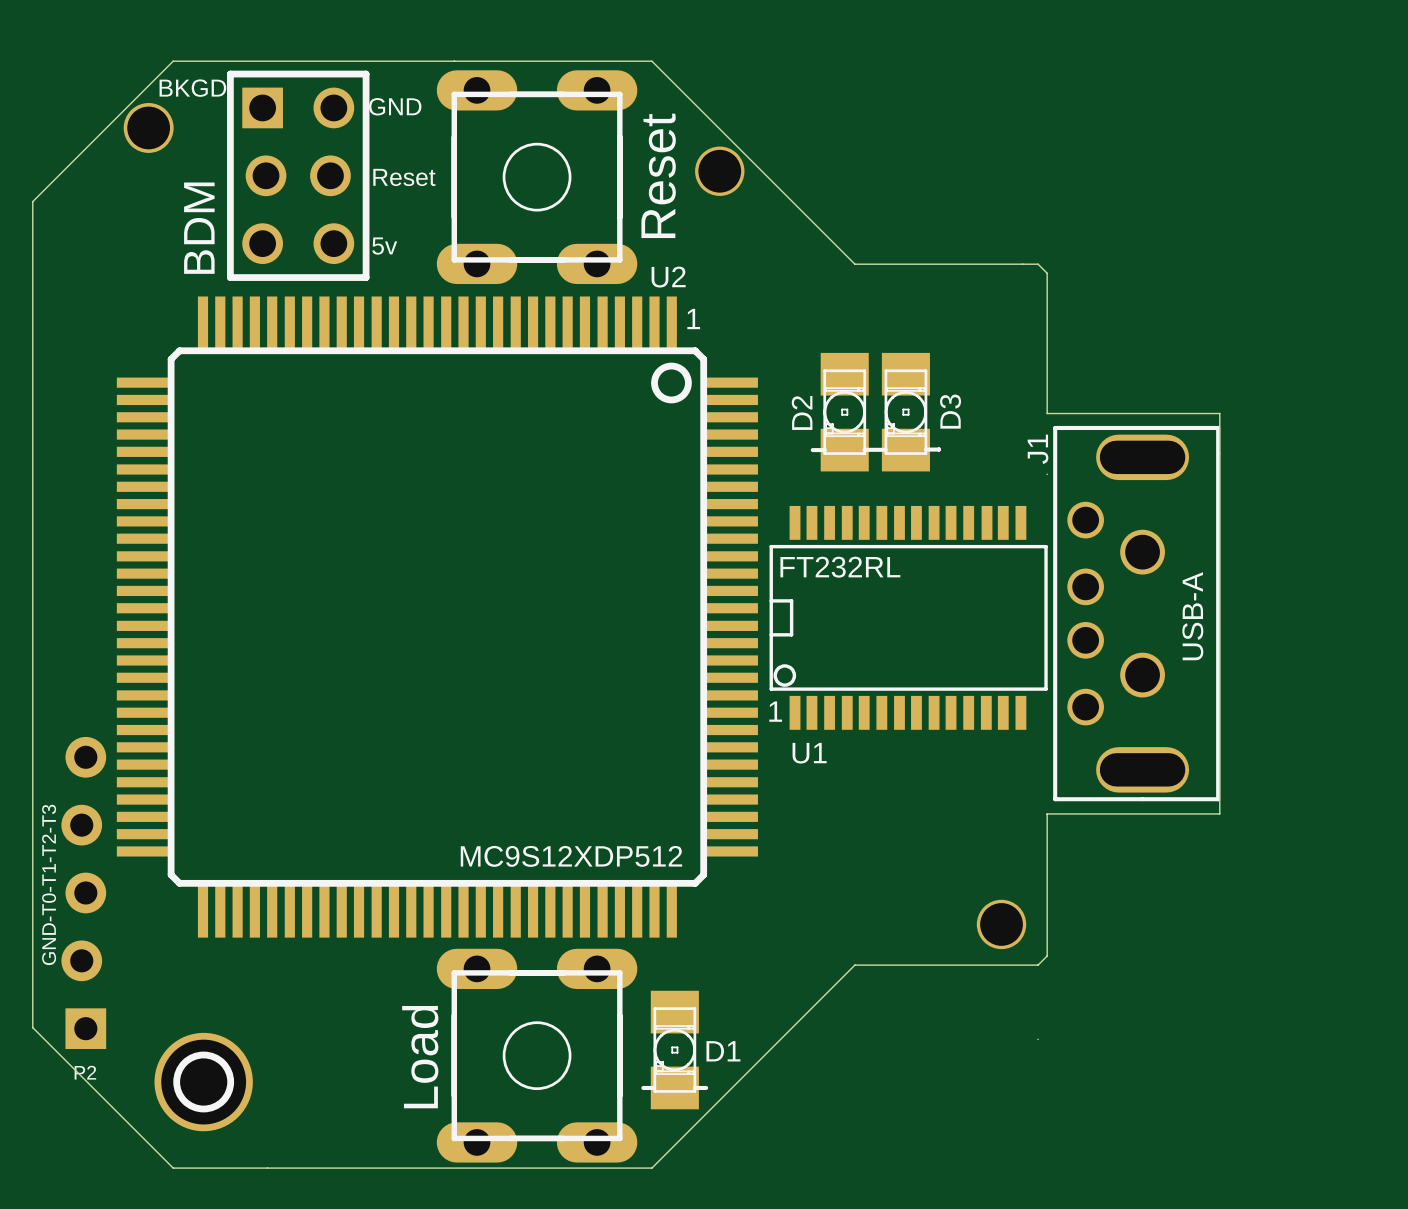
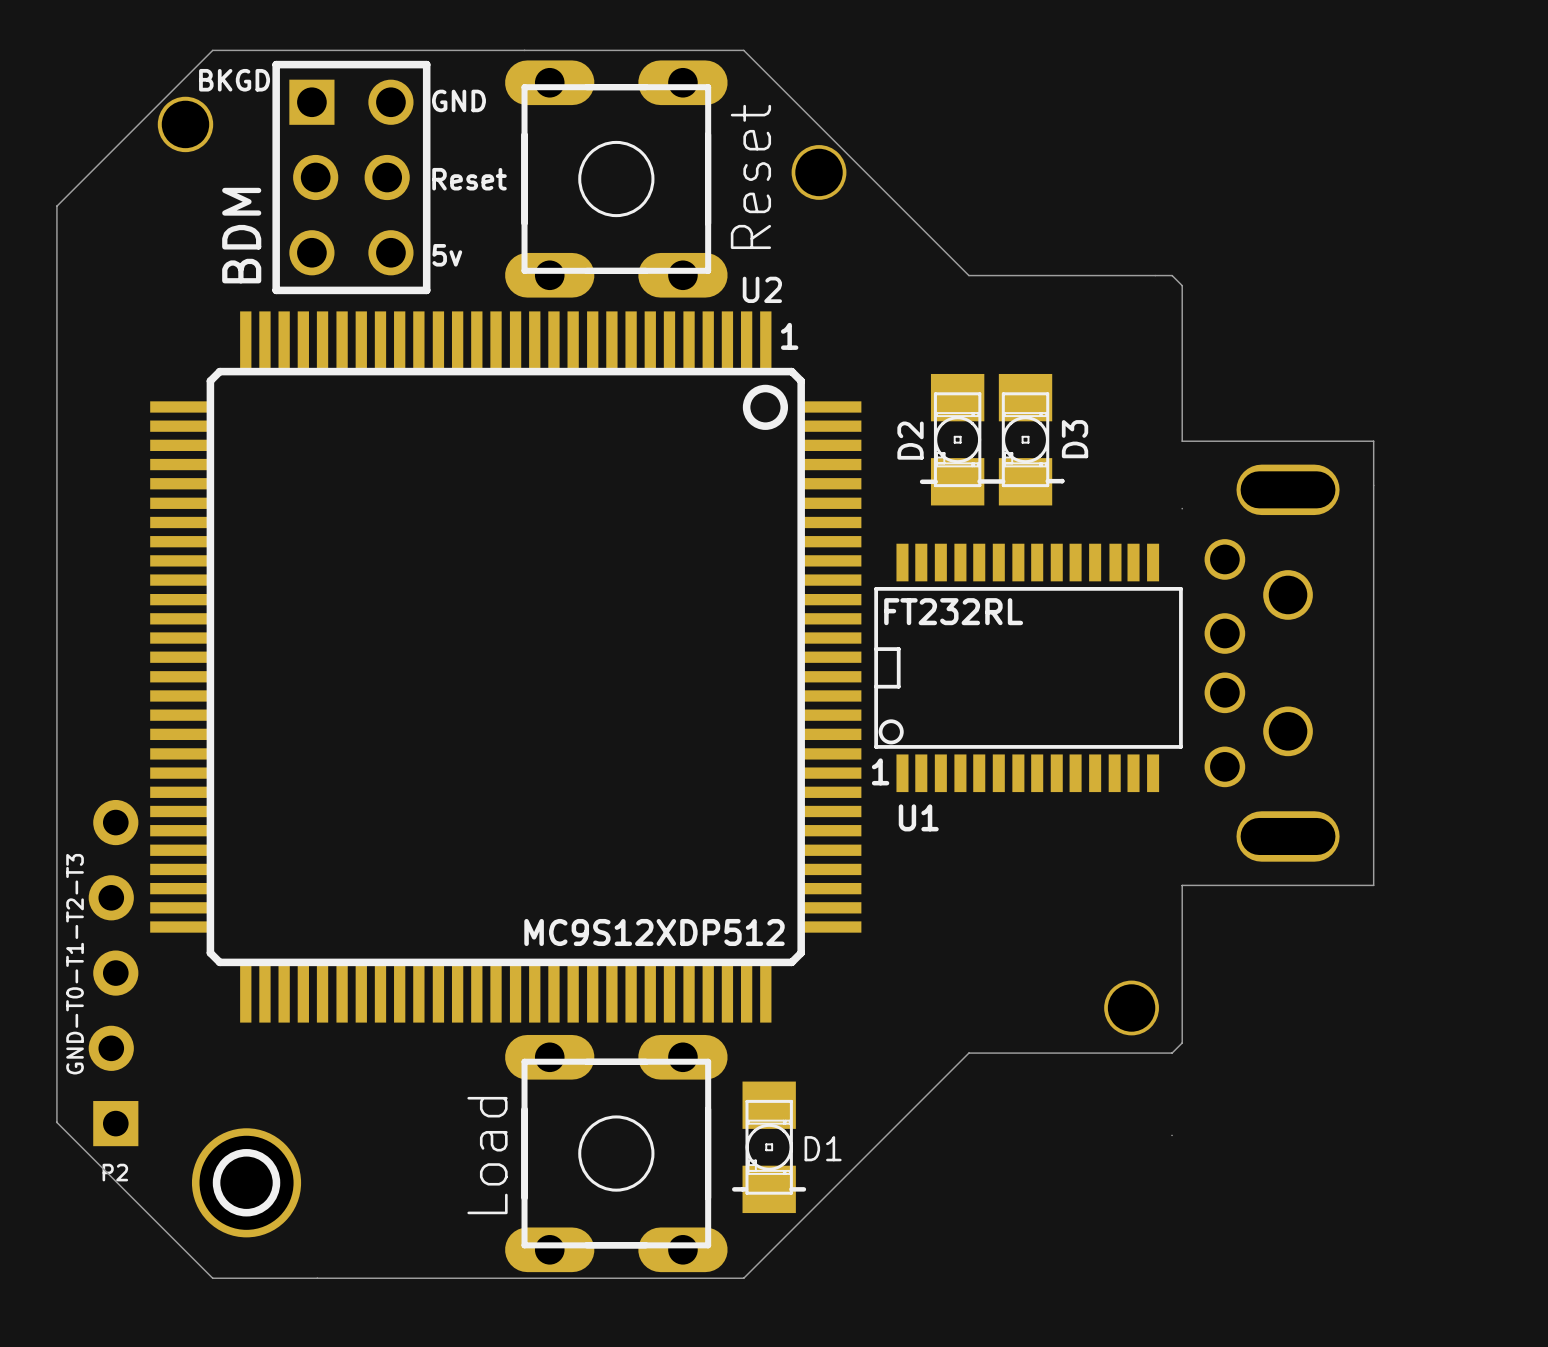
text: J1 (1038, 449) -> none
text: USB-A (1192, 616) -> none
line: (1142, 799) (1055, 799) (1055, 427) (1218, 427) (1218, 799) (1142, 799) -> none

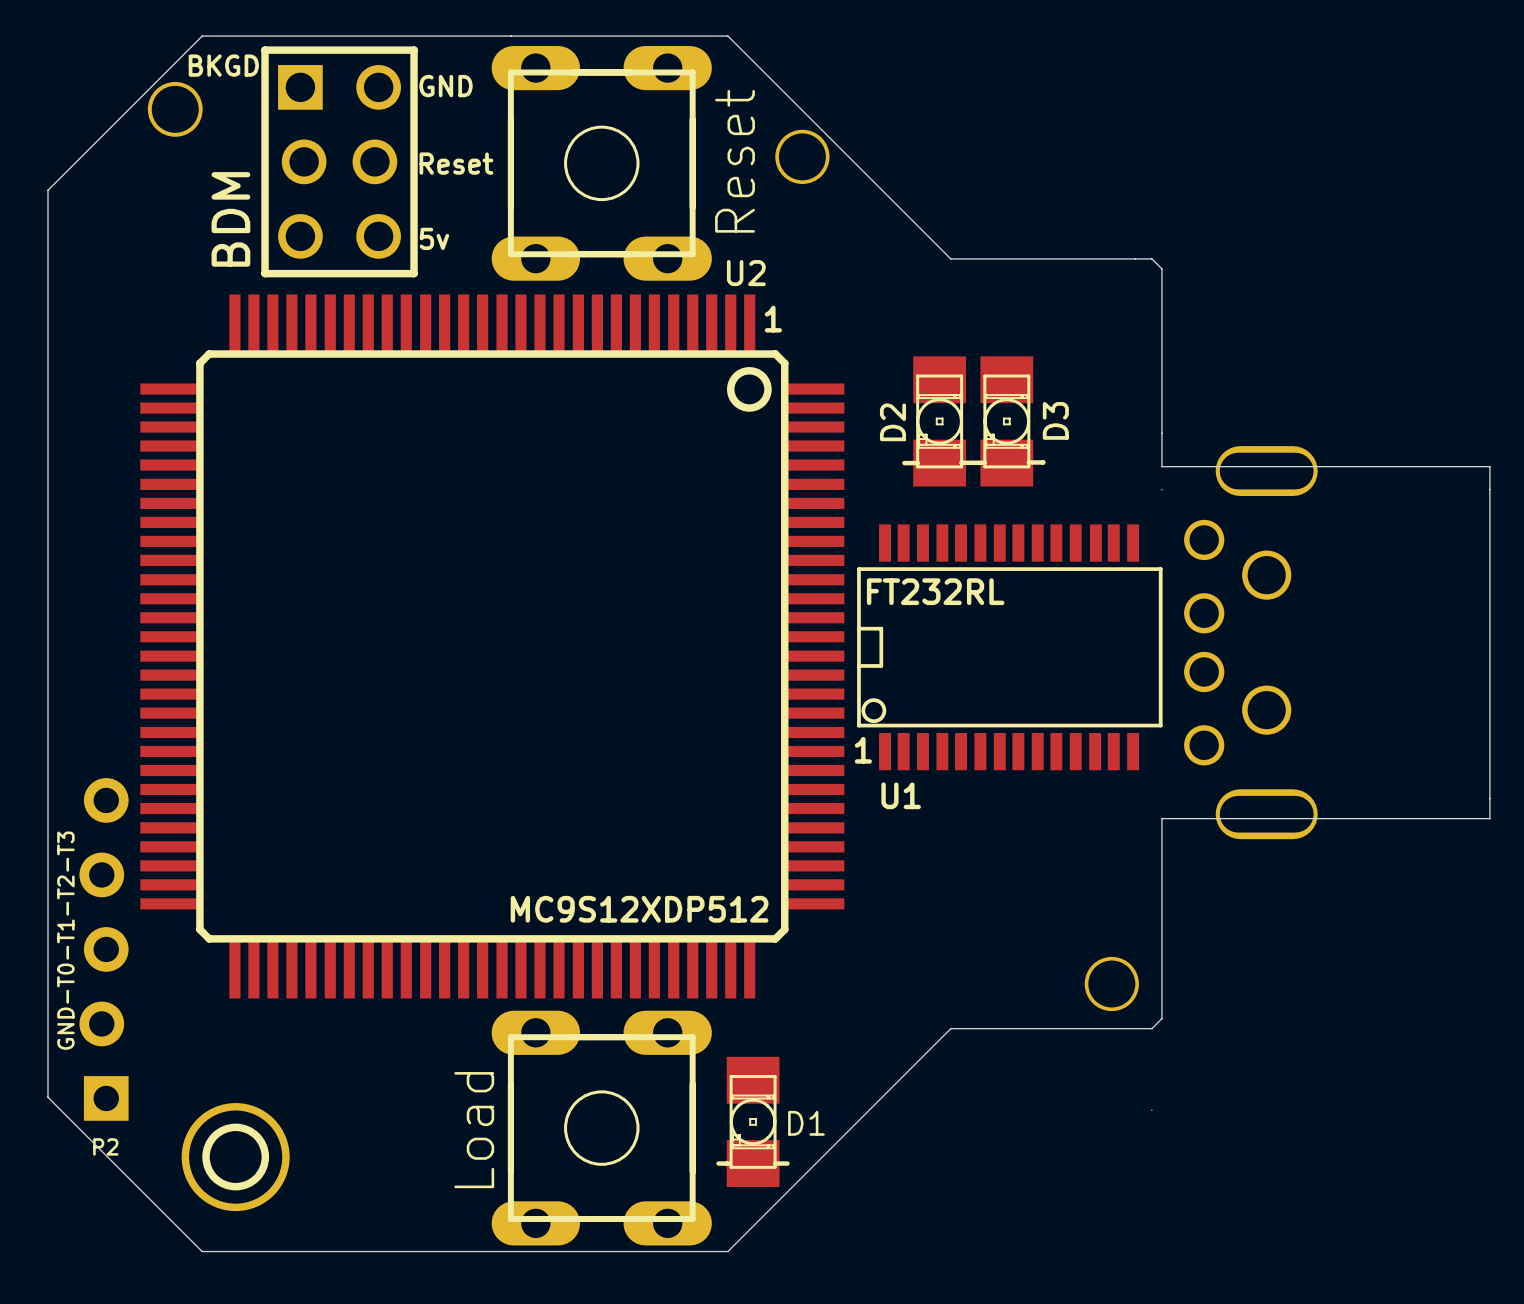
board edge: (1182, 441) (1373, 441) (1373, 885) (1182, 885) -> (1161, 422) (1161, 466) (1489, 466) (1489, 818) (1161, 818) (1161, 862)

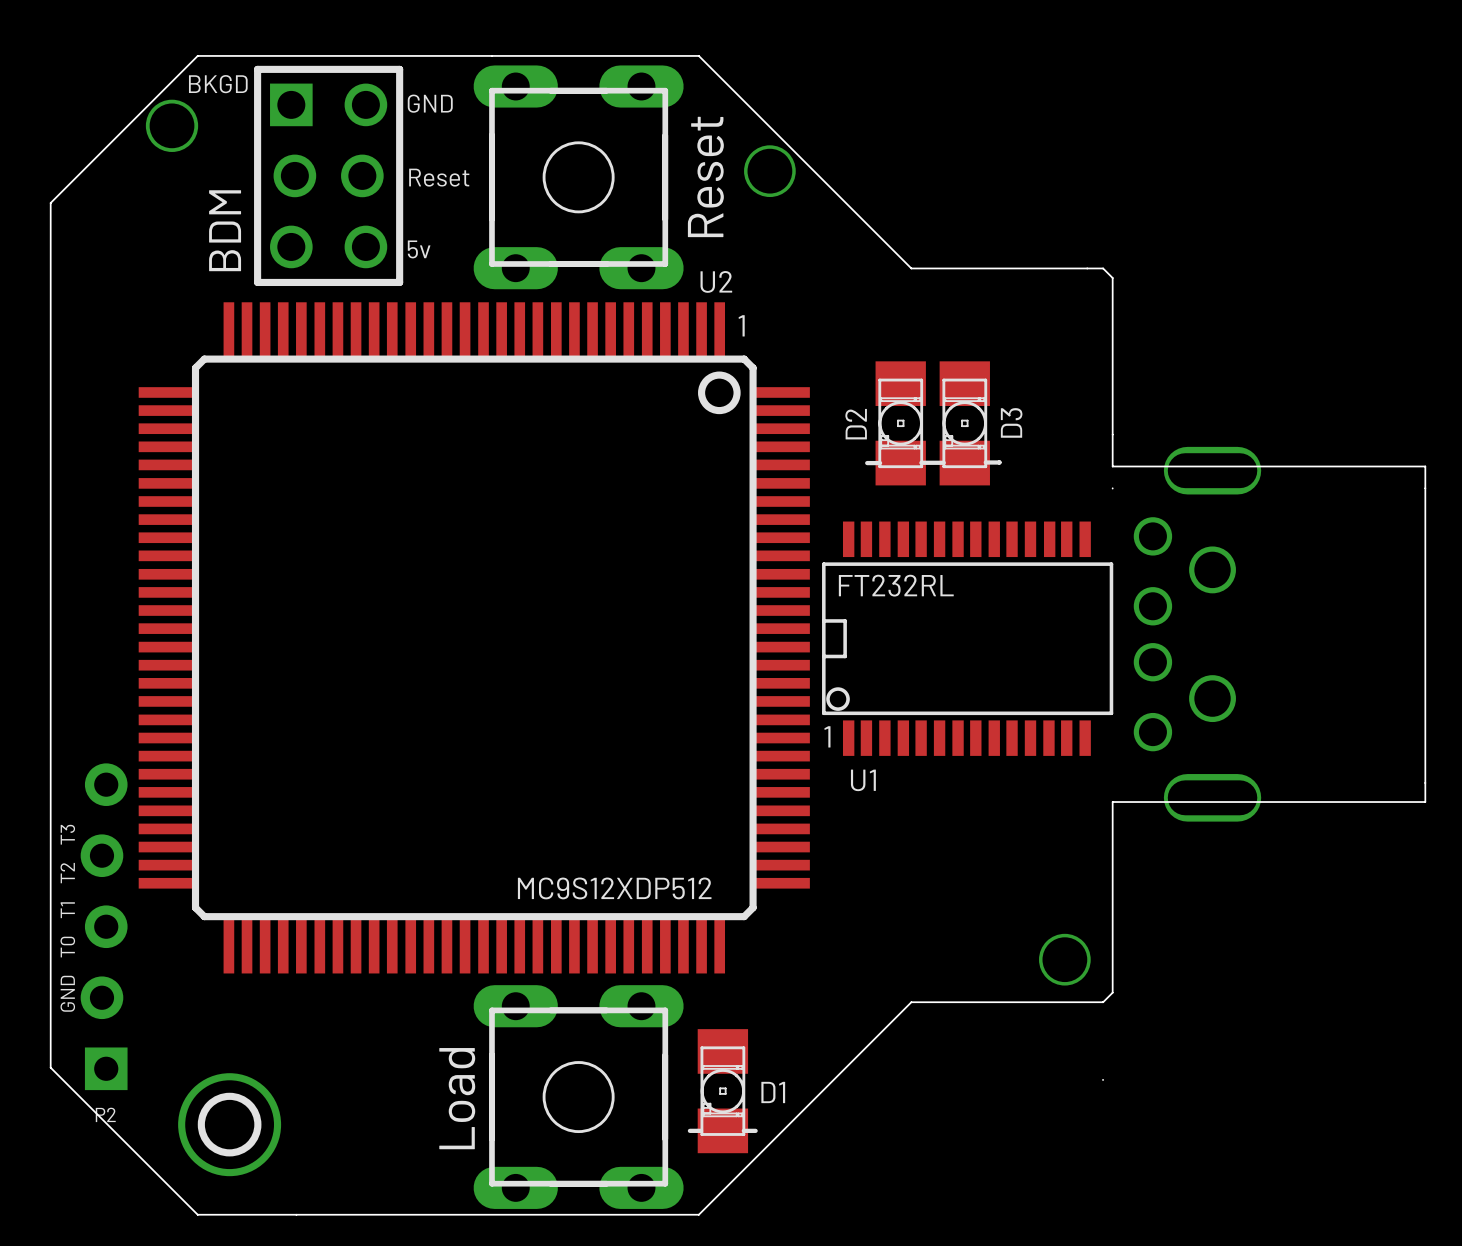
P2 value: GND-T0-T1-T2-T3 (65, 940) -> GND T0 T1 T2 T3 (67, 918)

